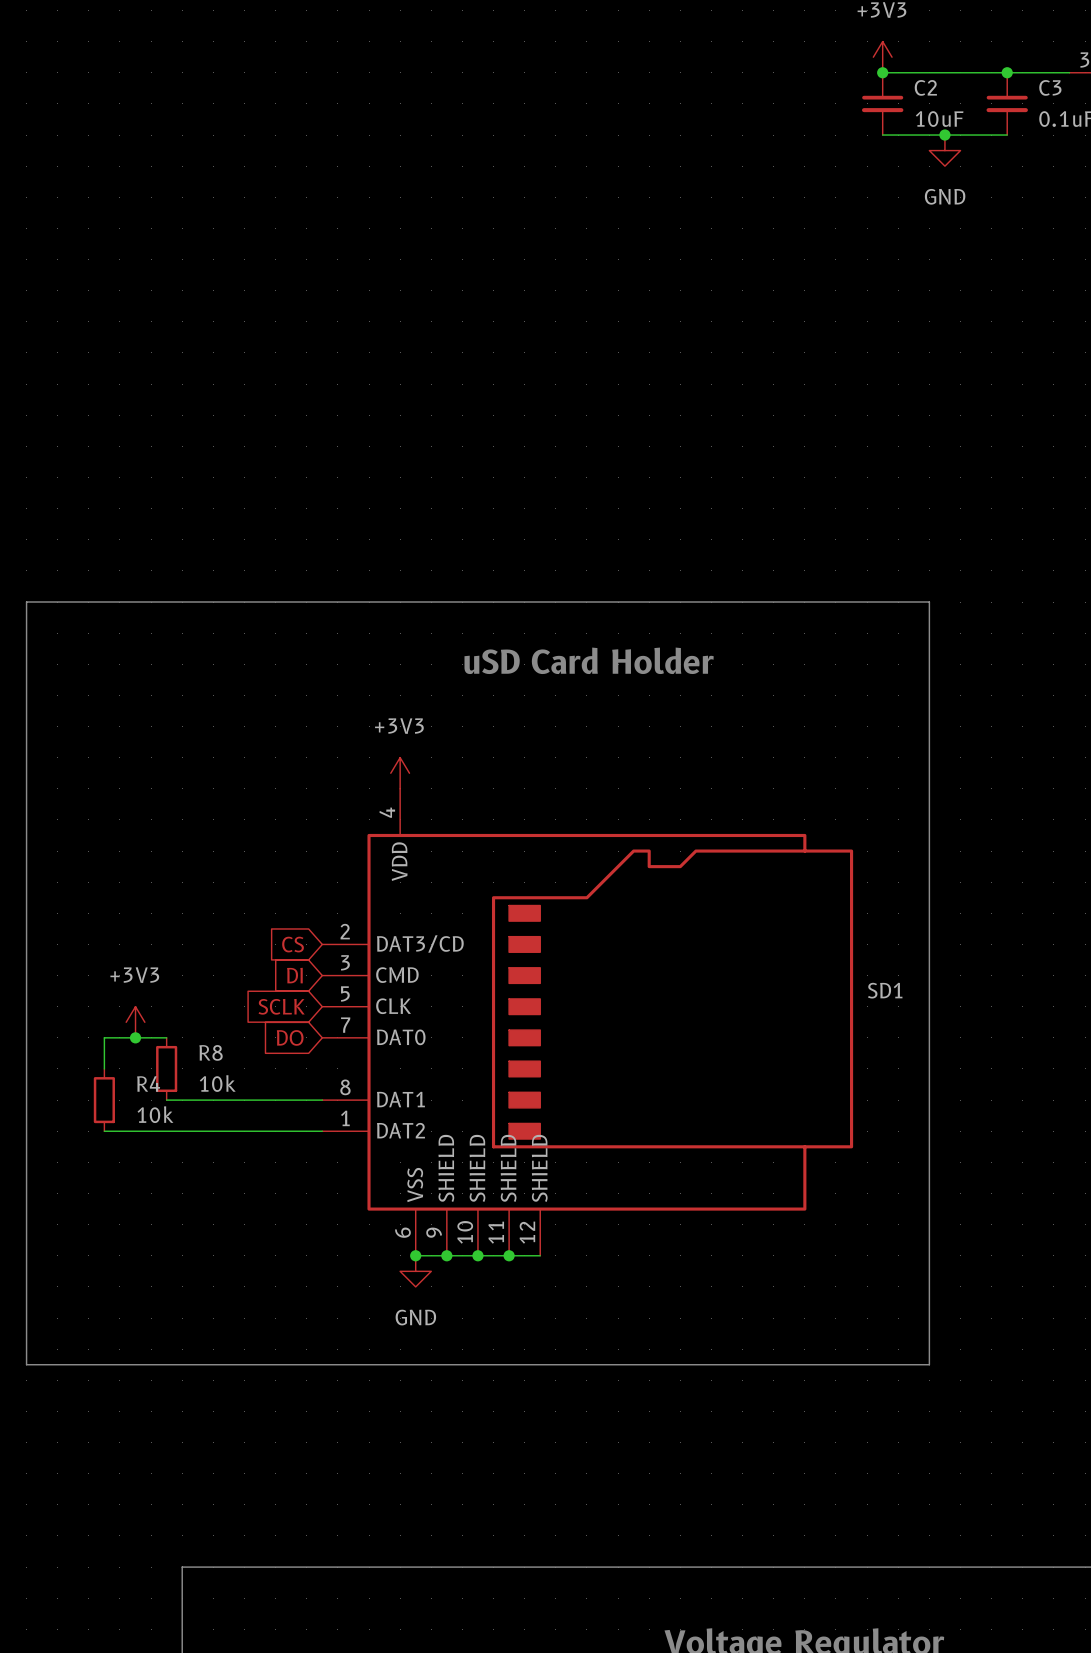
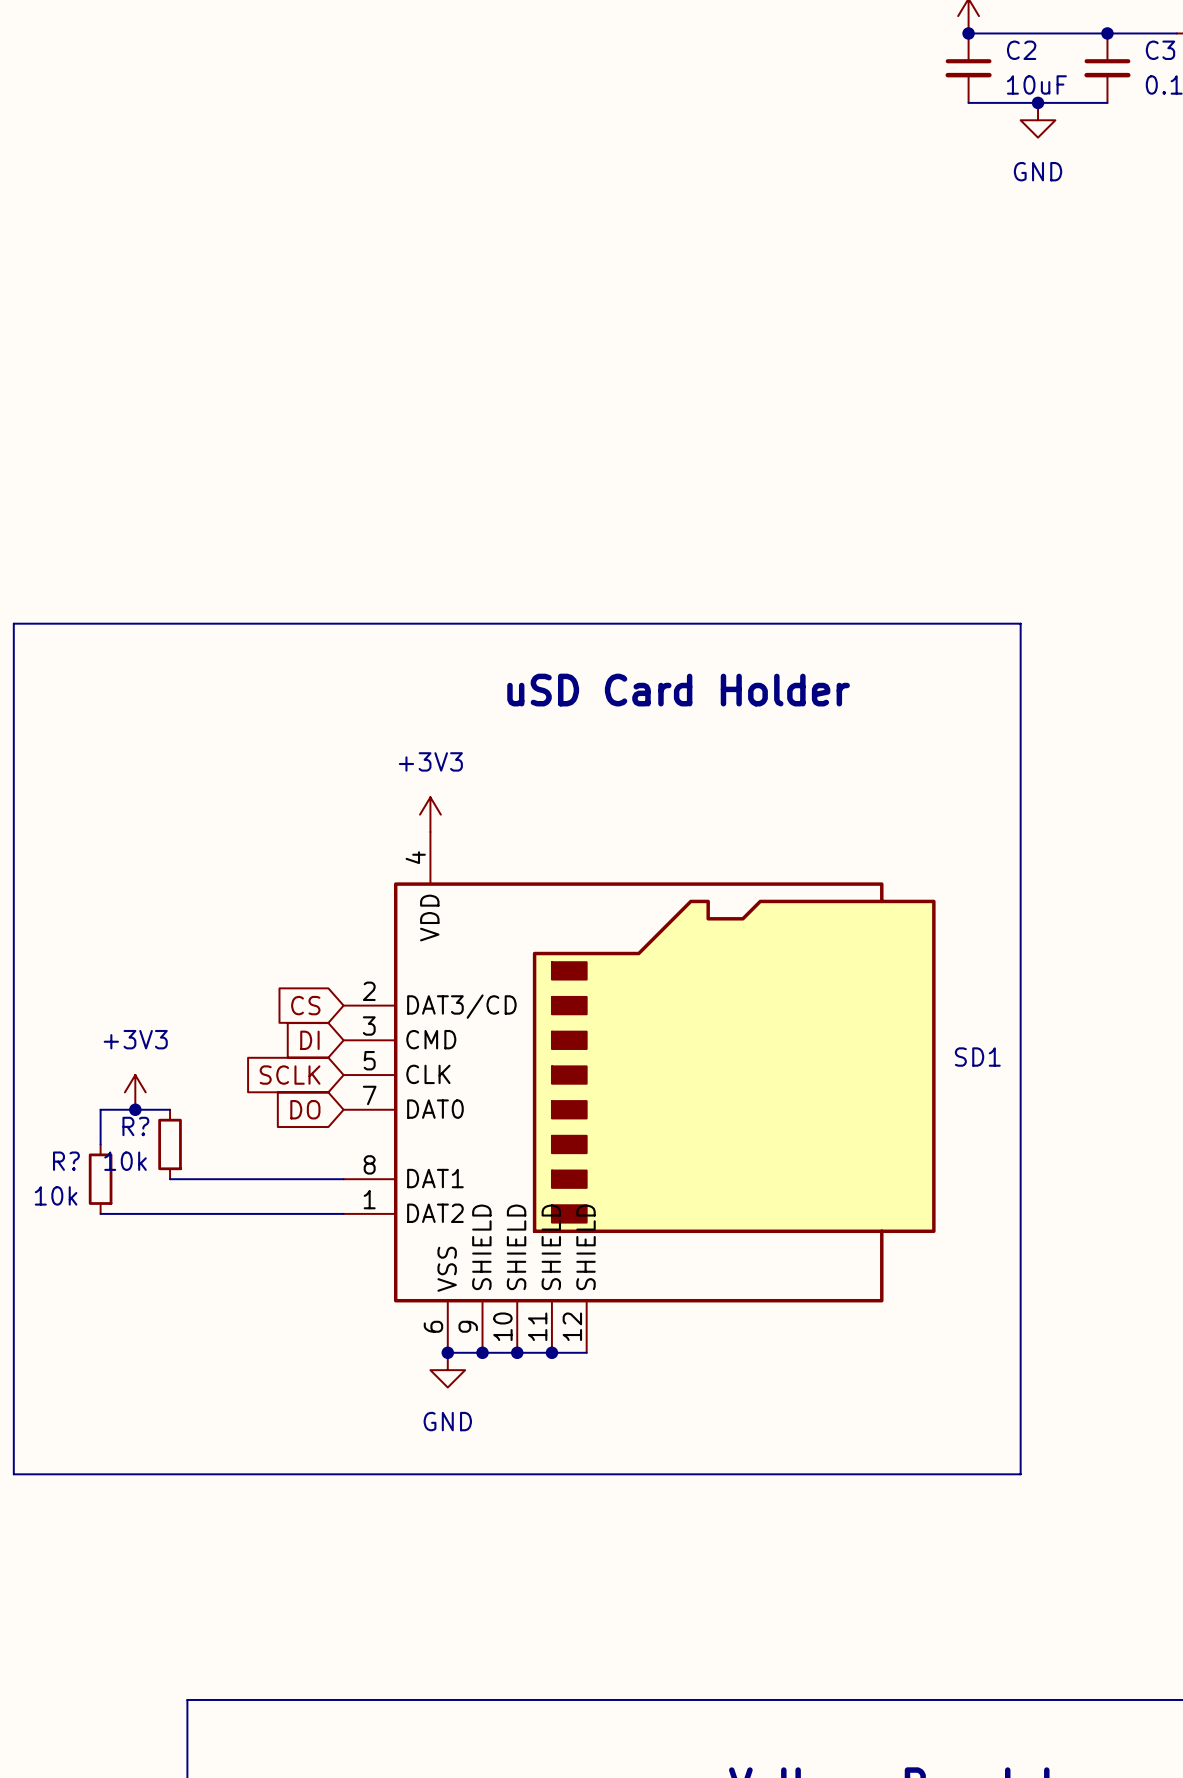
R8 name: R8 (211, 1052) -> R? (135, 1126)
R4 name: R4 (148, 1083) -> R? (66, 1161)
R8 value position: 10k (217, 1083) -> 10k (125, 1161)
R4 value position: 10k (155, 1114) -> 10k (56, 1195)

